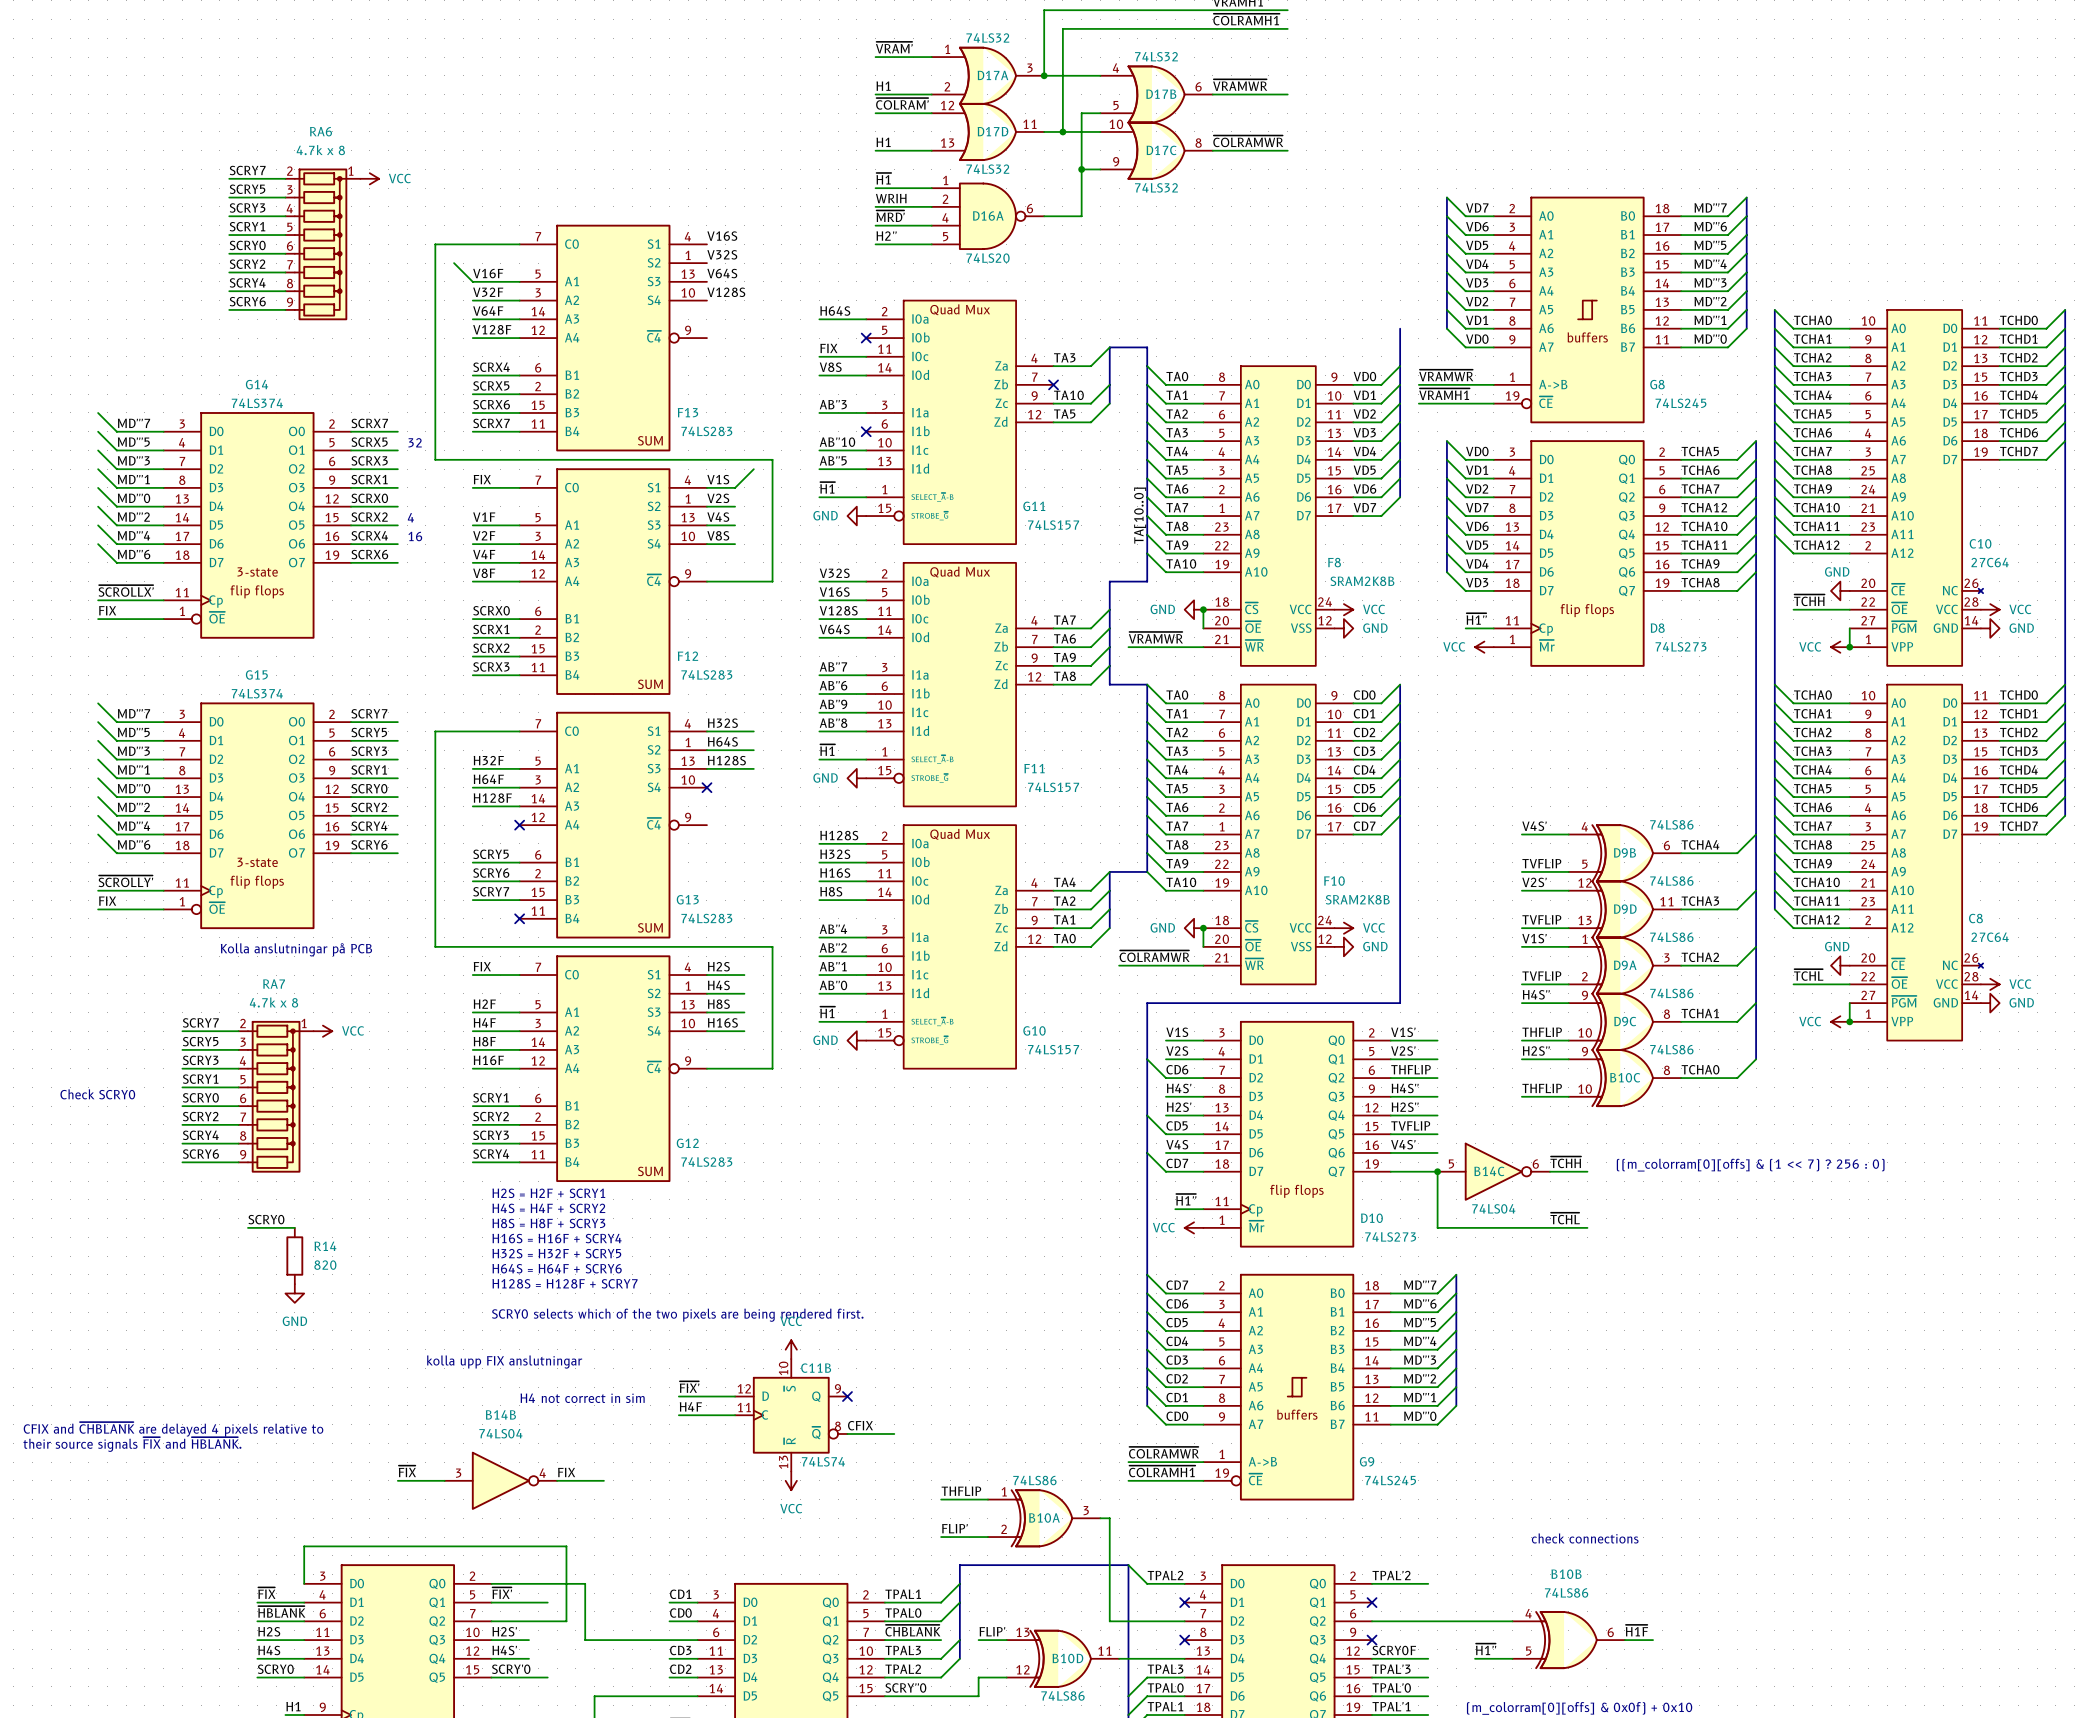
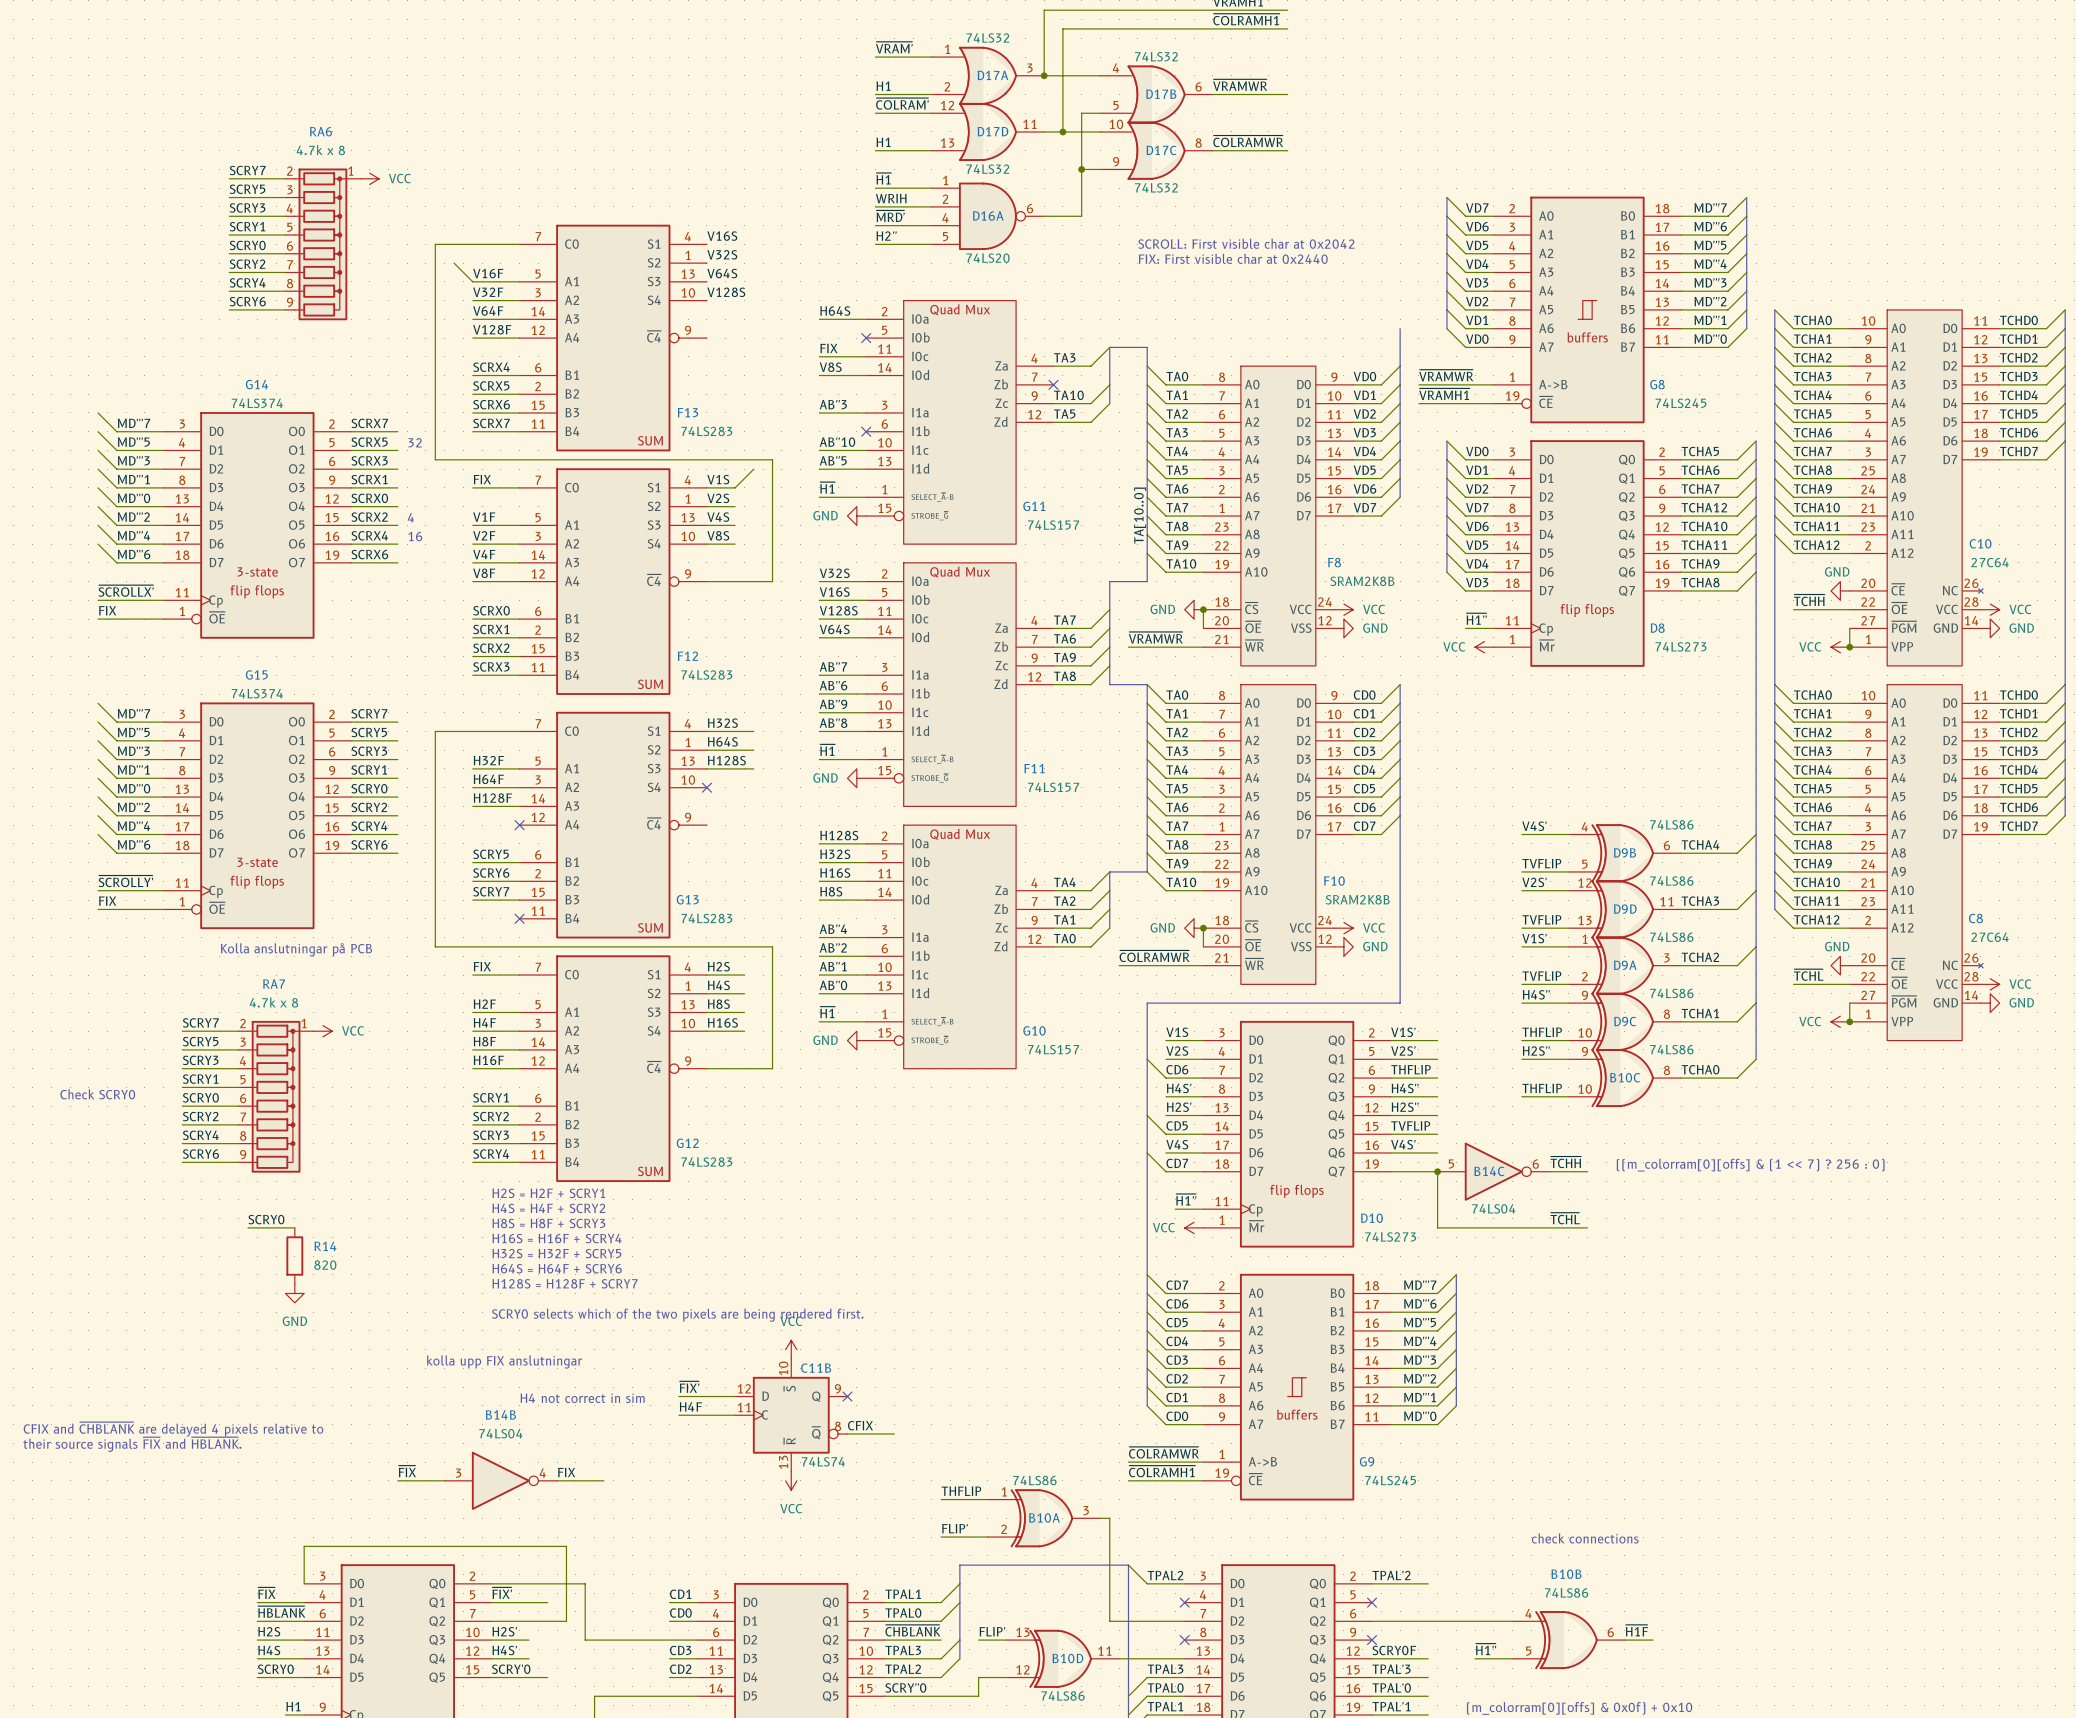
text: none -> SCROLL: First visible char at 0x2042 (1246, 243)
text: none -> FIX: First visible char at 0x2440 (1233, 258)

